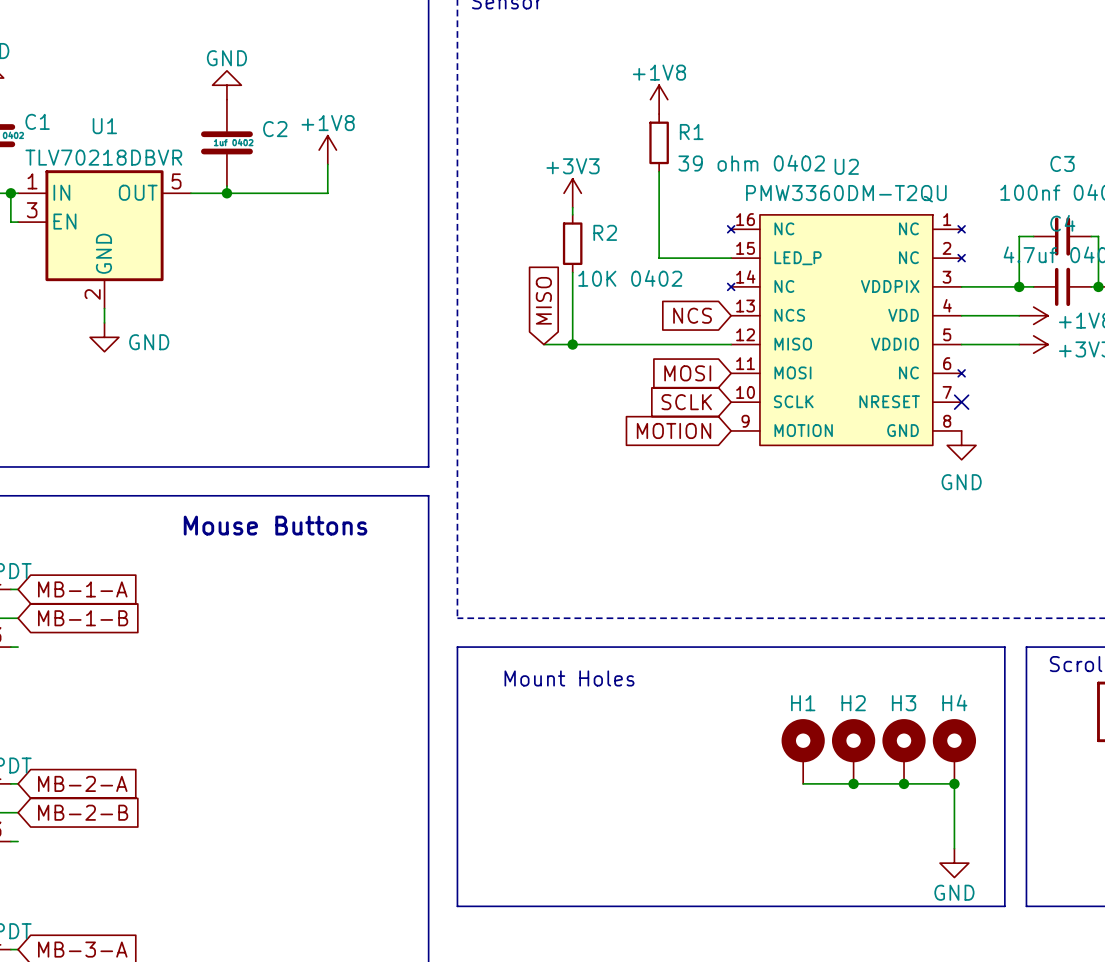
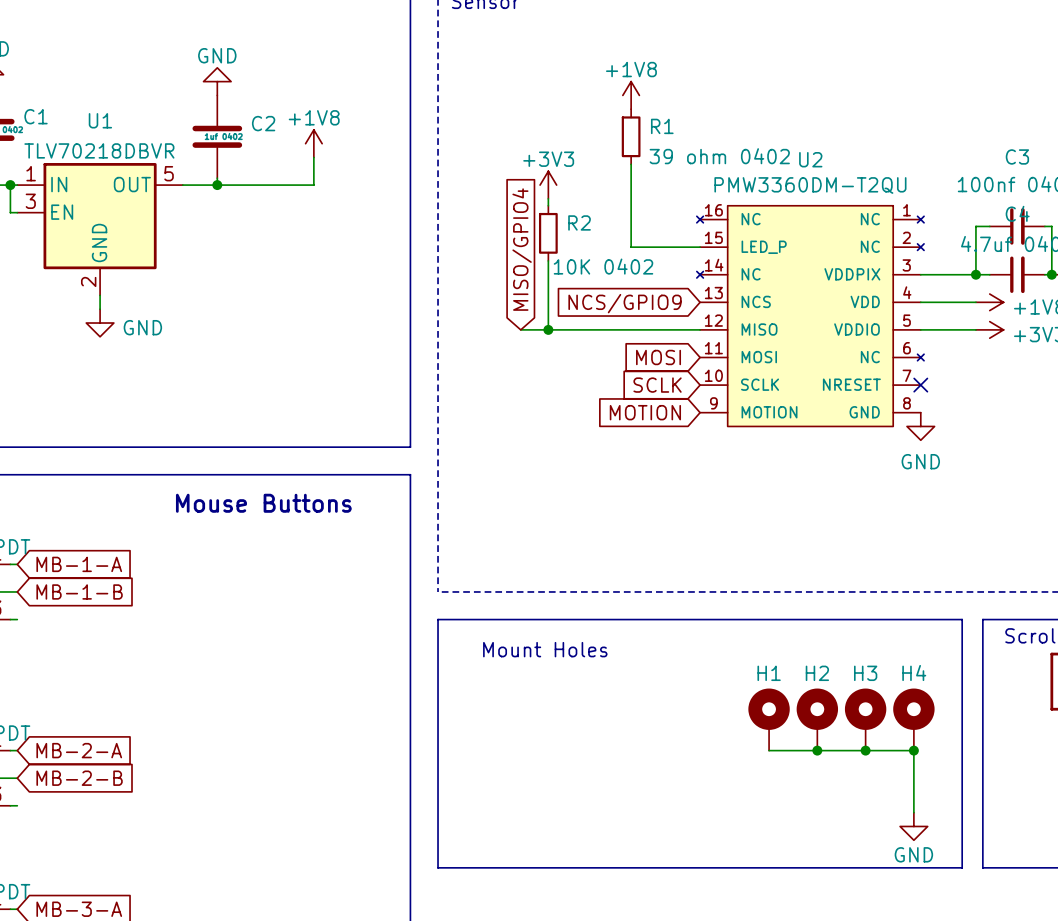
global label: MISO (543, 300) -> MISO/GPIO4 (522, 249)
global label: NCS (692, 315) -> NCS/GPIO9 (625, 303)

